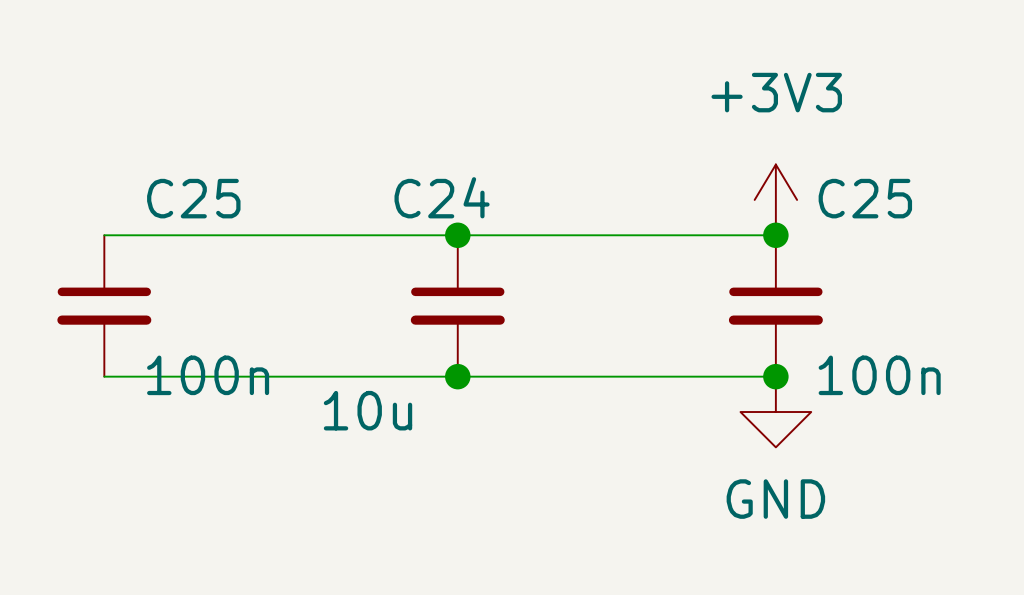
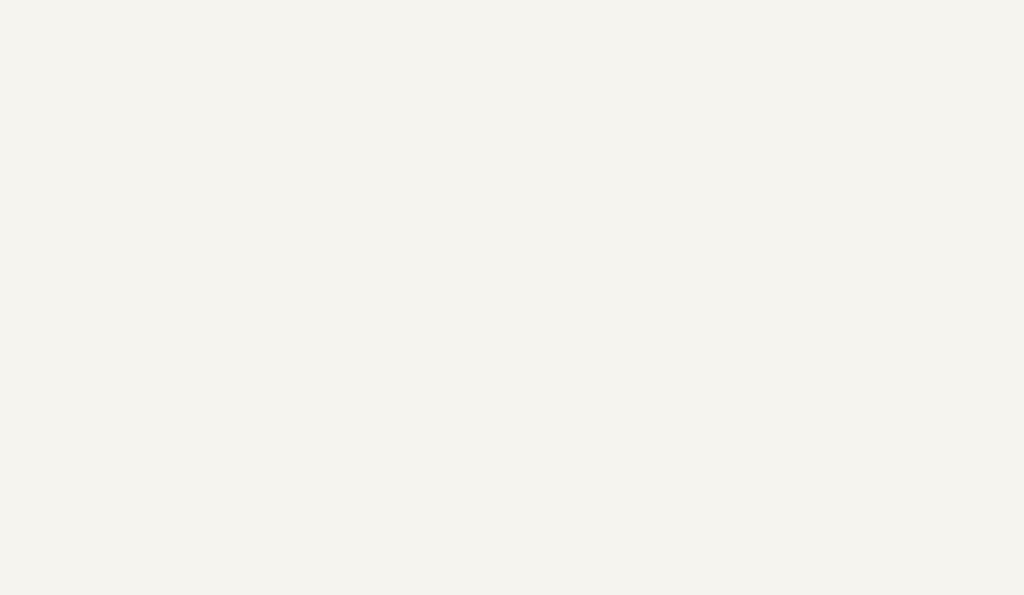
power symbol: +3V3 (775, 199) -> none
wire: (104, 235) (775, 235) -> none
junction: (457, 235) -> none
junction: (775, 235) -> none
C25: 100n (104, 305) -> none
C24: 10u (457, 305) -> none
C25: 100n (775, 305) -> none
wire: (104, 376) (775, 376) -> none
junction: (457, 376) -> none
junction: (775, 376) -> none
power symbol: GND (775, 412) -> none

